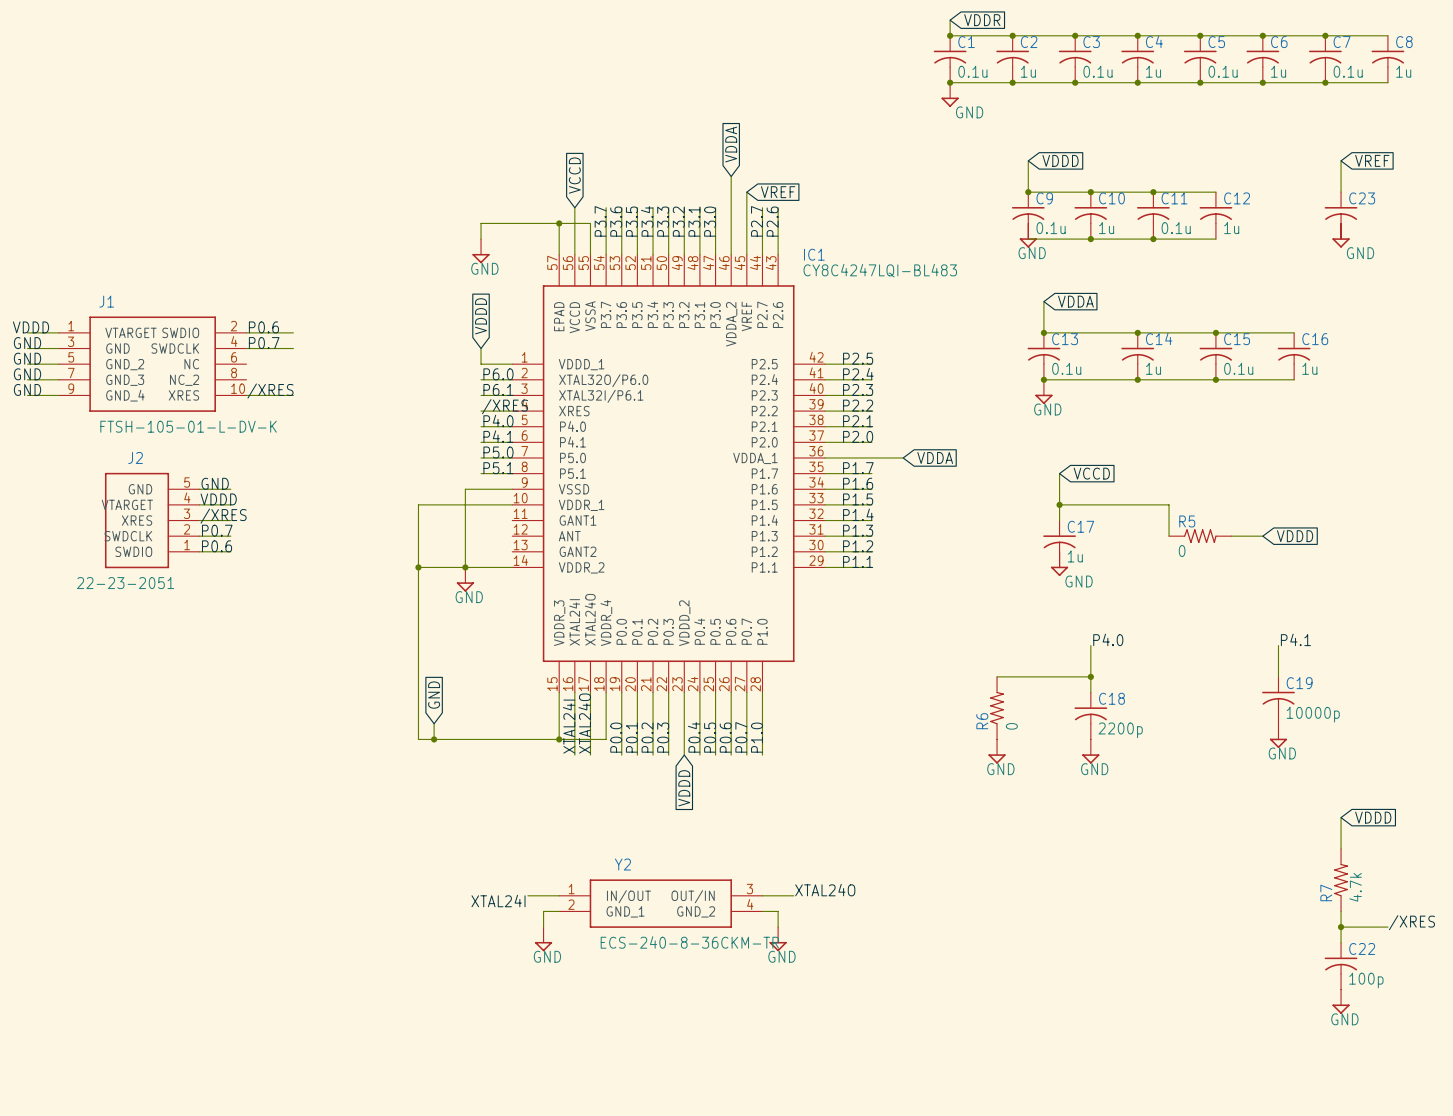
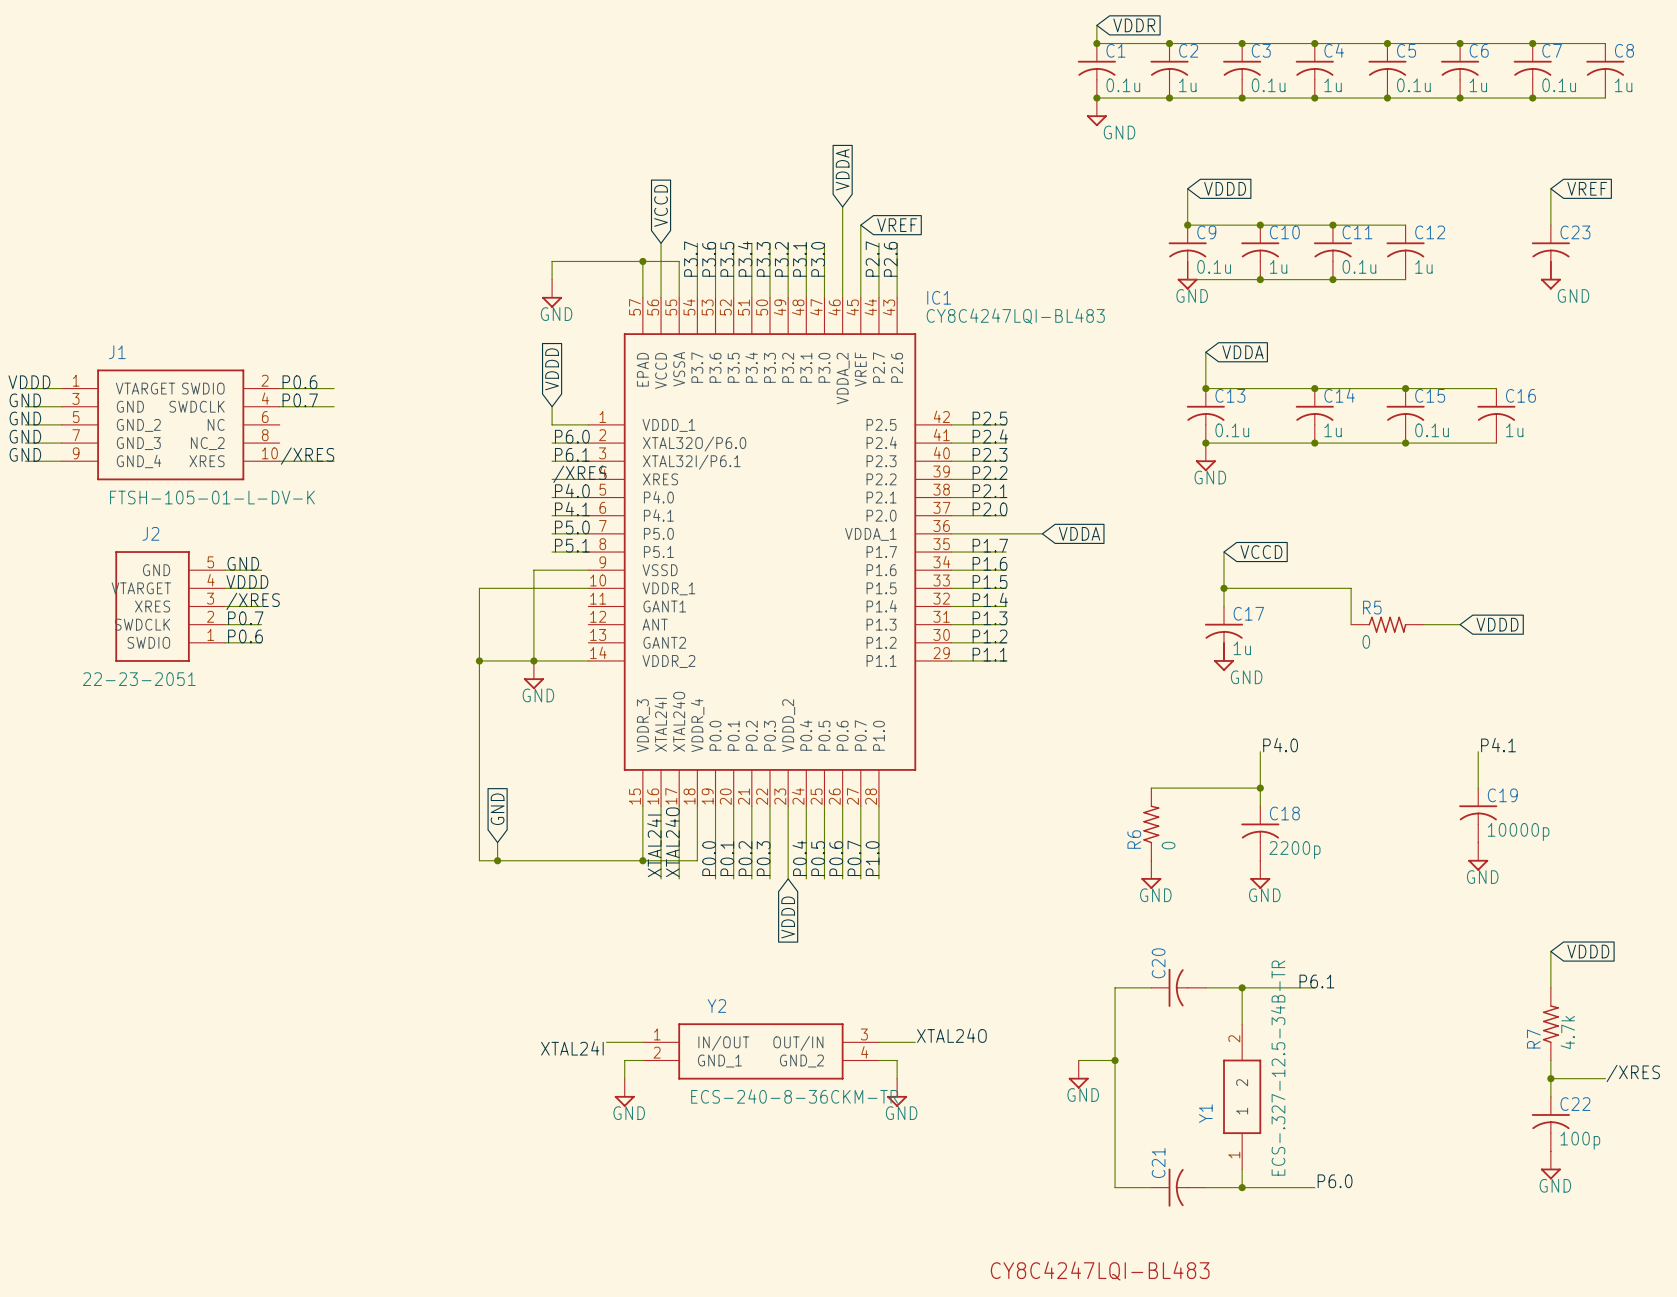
label: none -> P6.1 (1316, 981)
wire: none -> (1151, 987) (1115, 987) (1115, 1187) (1151, 1187)
C20: none -> (1178, 987)
wire: none -> (1205, 987) (1314, 987)
wire: none -> (1242, 987) (1242, 1024)
junction: none -> (1242, 987)
wire: none -> (1078, 1060) (1115, 1060)
junction: none -> (1115, 1060)
power symbol: none -> GND (1078, 1074)
Y1: none -> ECS-.327-12.5-34B-TR (1242, 1096)
wire: none -> (1242, 1169) (1242, 1187)
label: none -> P6.0 (1335, 1181)
C21: none -> (1178, 1187)
wire: none -> (1205, 1187) (1314, 1187)
junction: none -> (1242, 1187)
text: none -> CY8C4247LQI-BL483 (1100, 1270)

